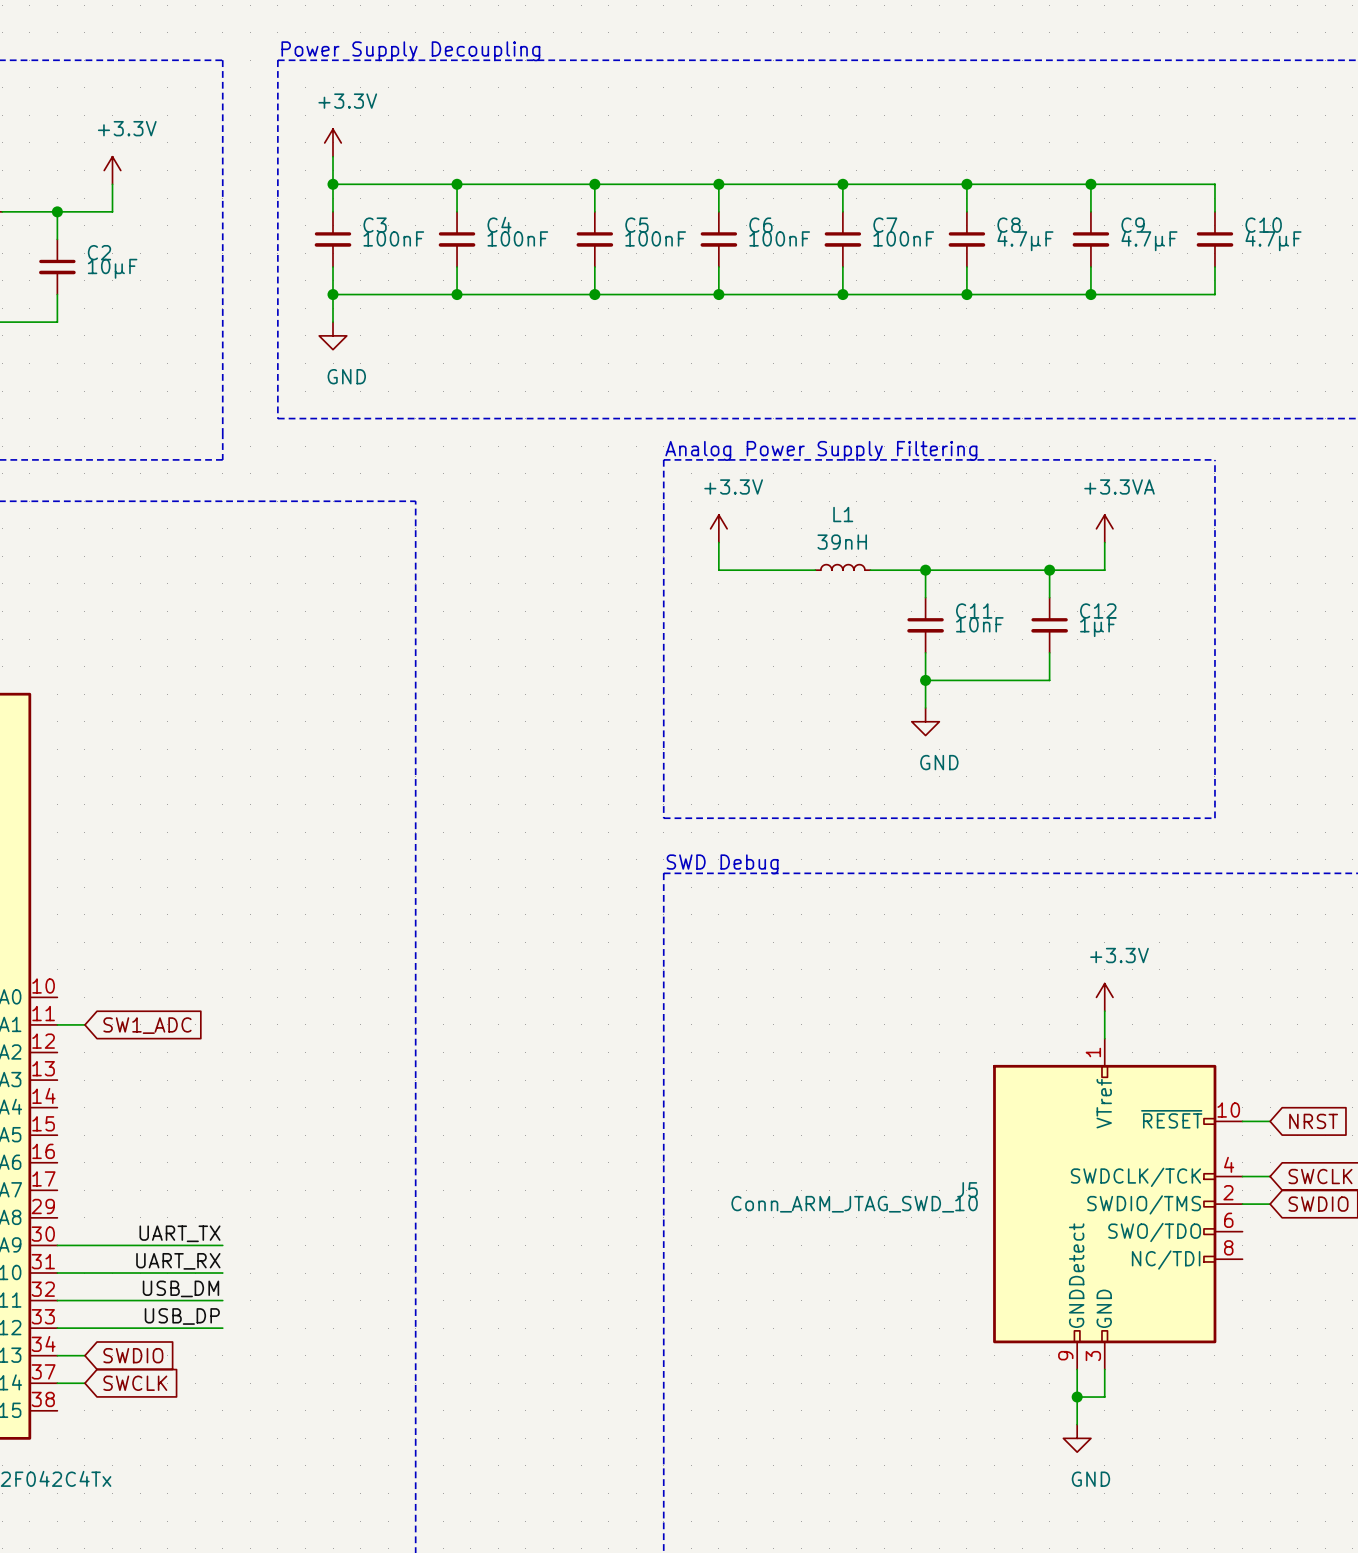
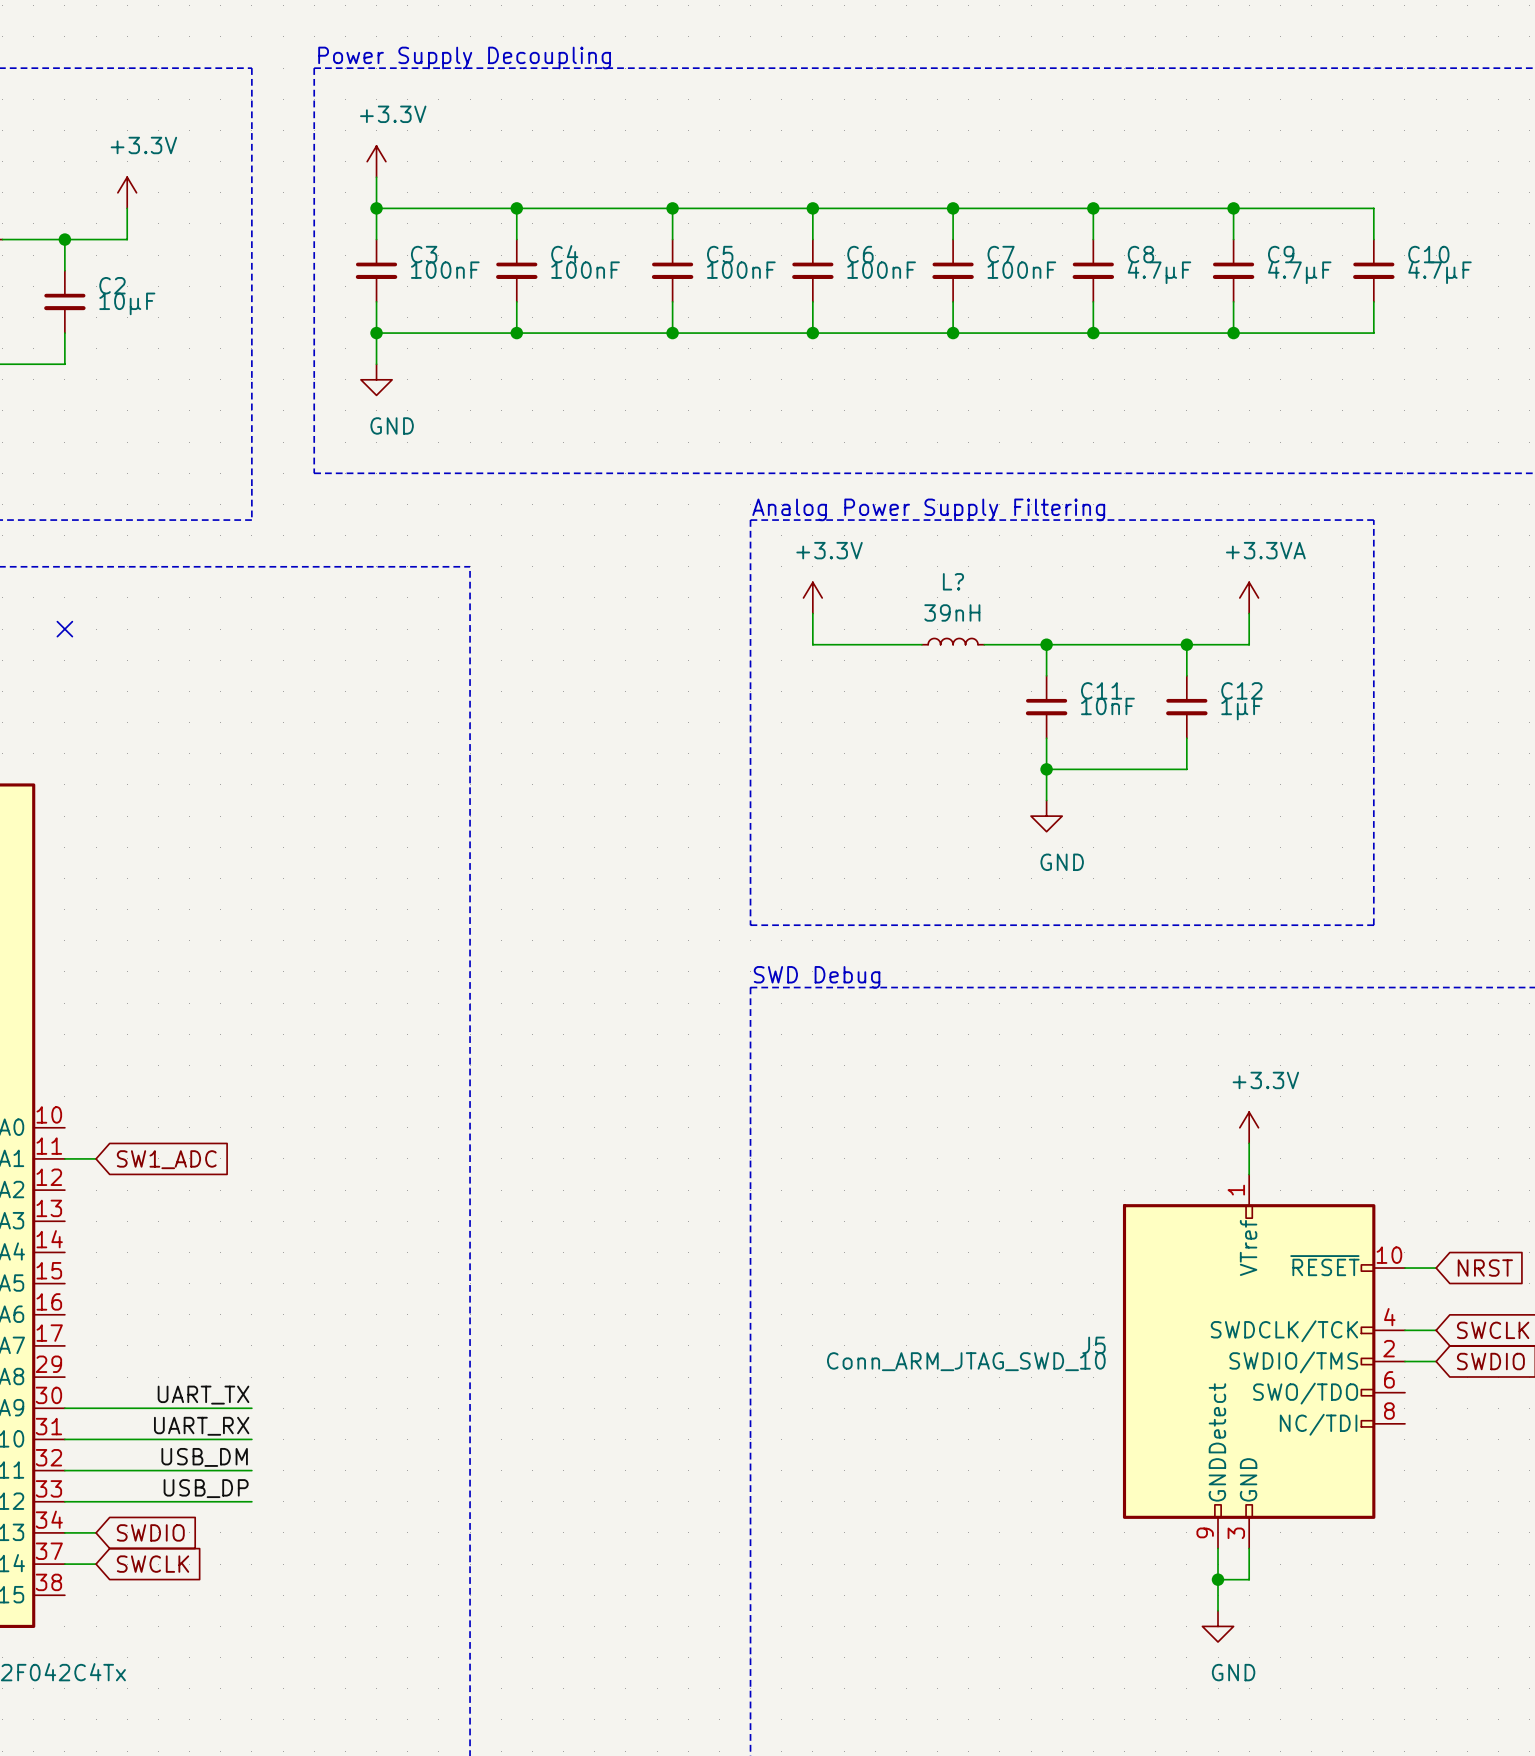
L1 name: L1 (843, 514) -> L? (953, 581)
no-connect mark: none -> (64, 629)

